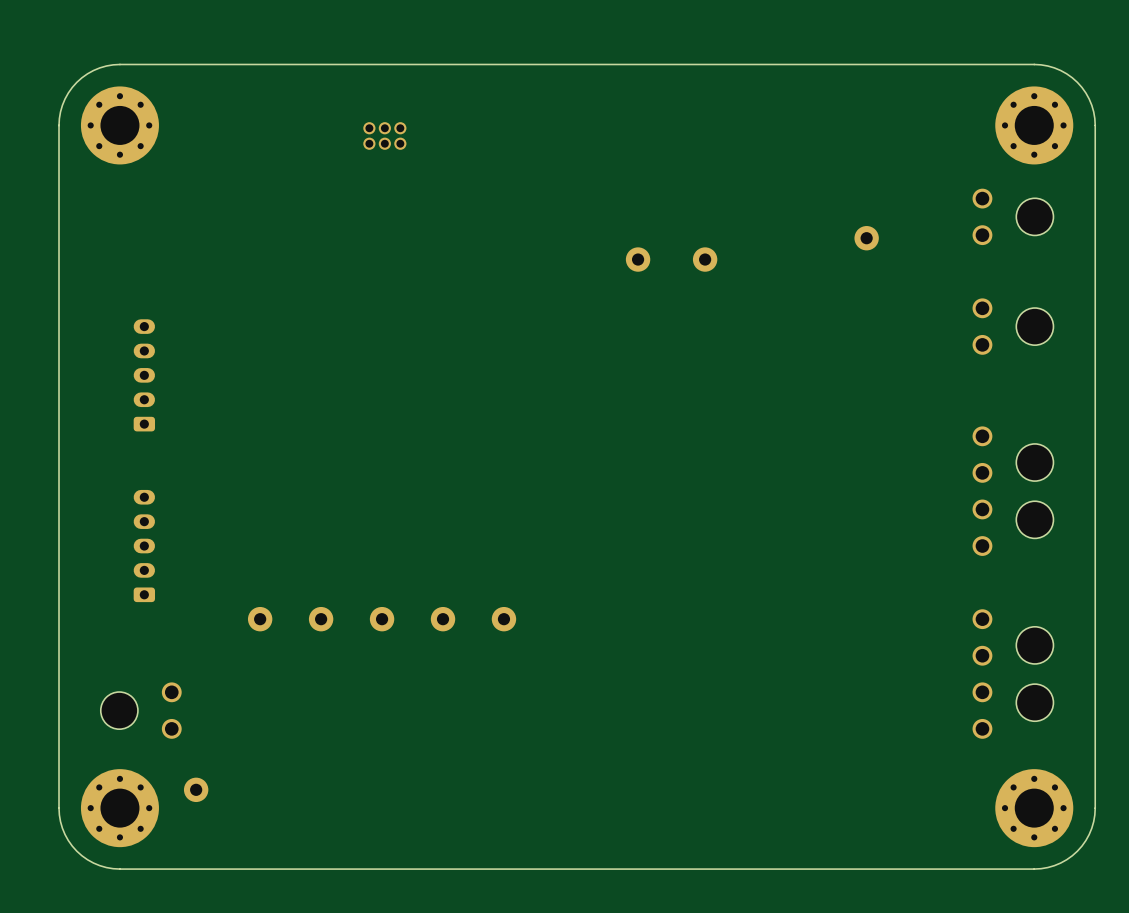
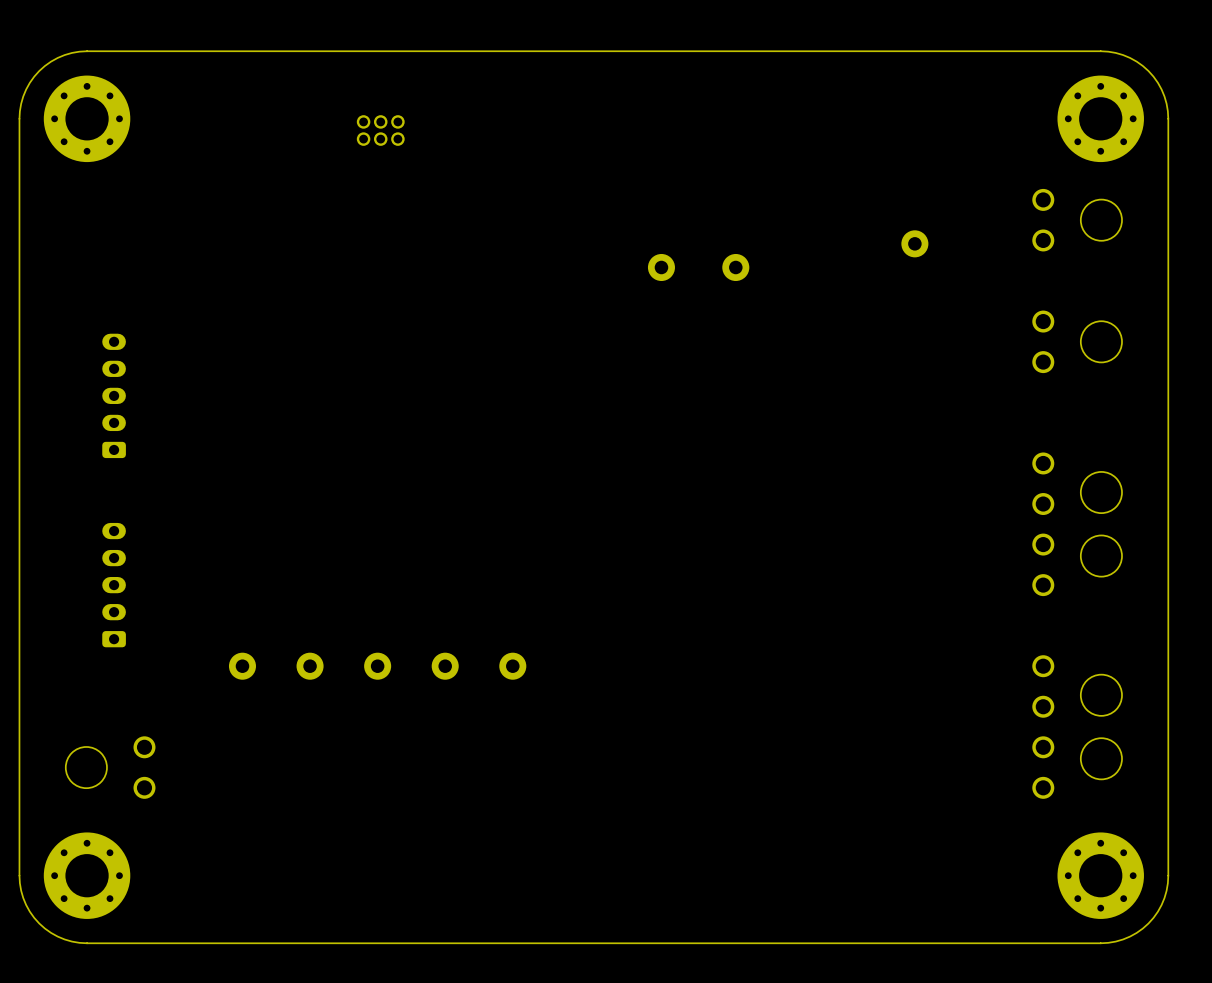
part: (196, 789) -> none

